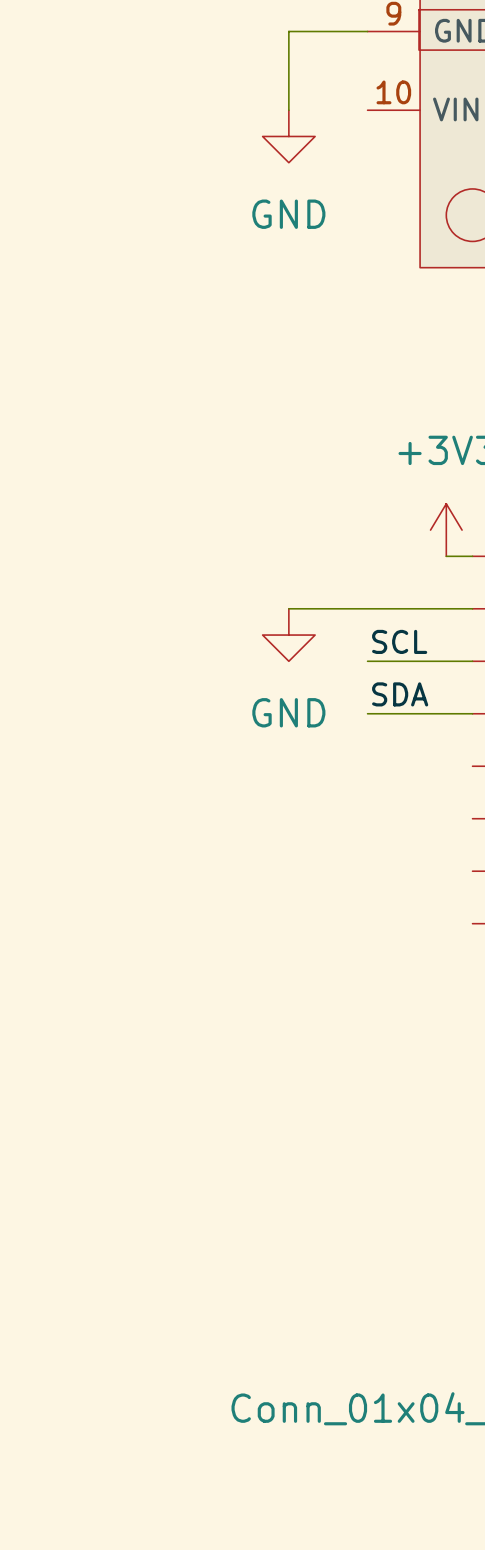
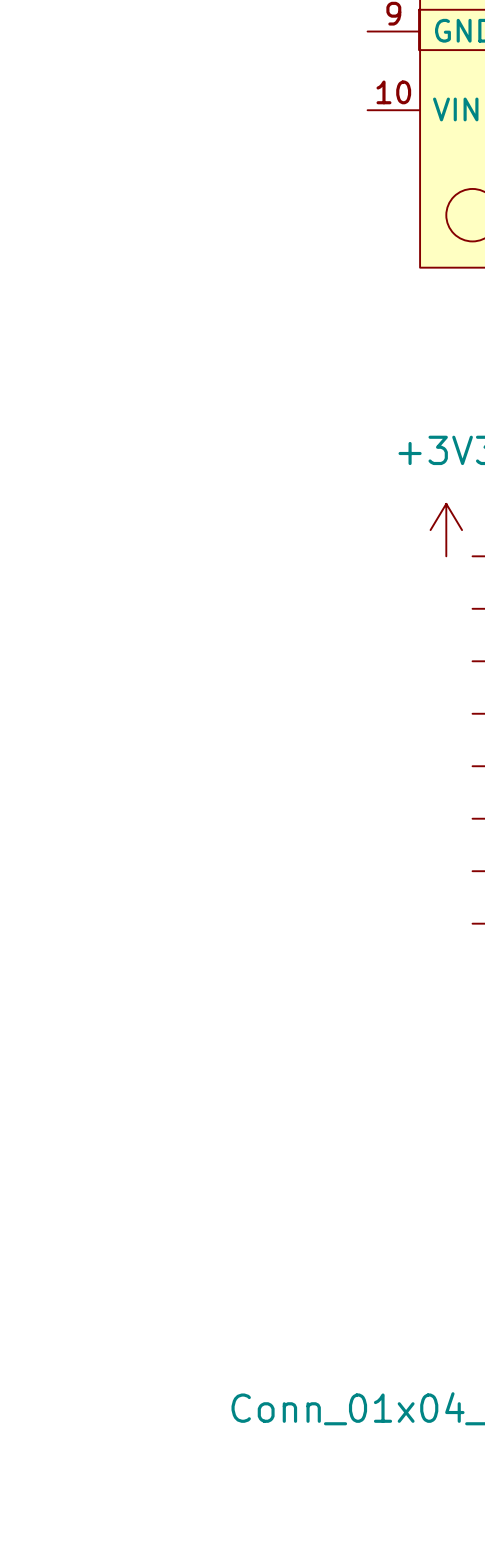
wire: (367, 31) (288, 31) (288, 110) -> none
power symbol: GND (288, 136) -> none
wire: (446, 556) (472, 556) -> none
wire: (288, 608) (472, 608) -> none
power symbol: GND (288, 635) -> none
label: SCL (399, 641) -> none
wire: (367, 661) (472, 661) -> none
label: SDA (400, 694) -> none
wire: (367, 713) (472, 713) -> none

